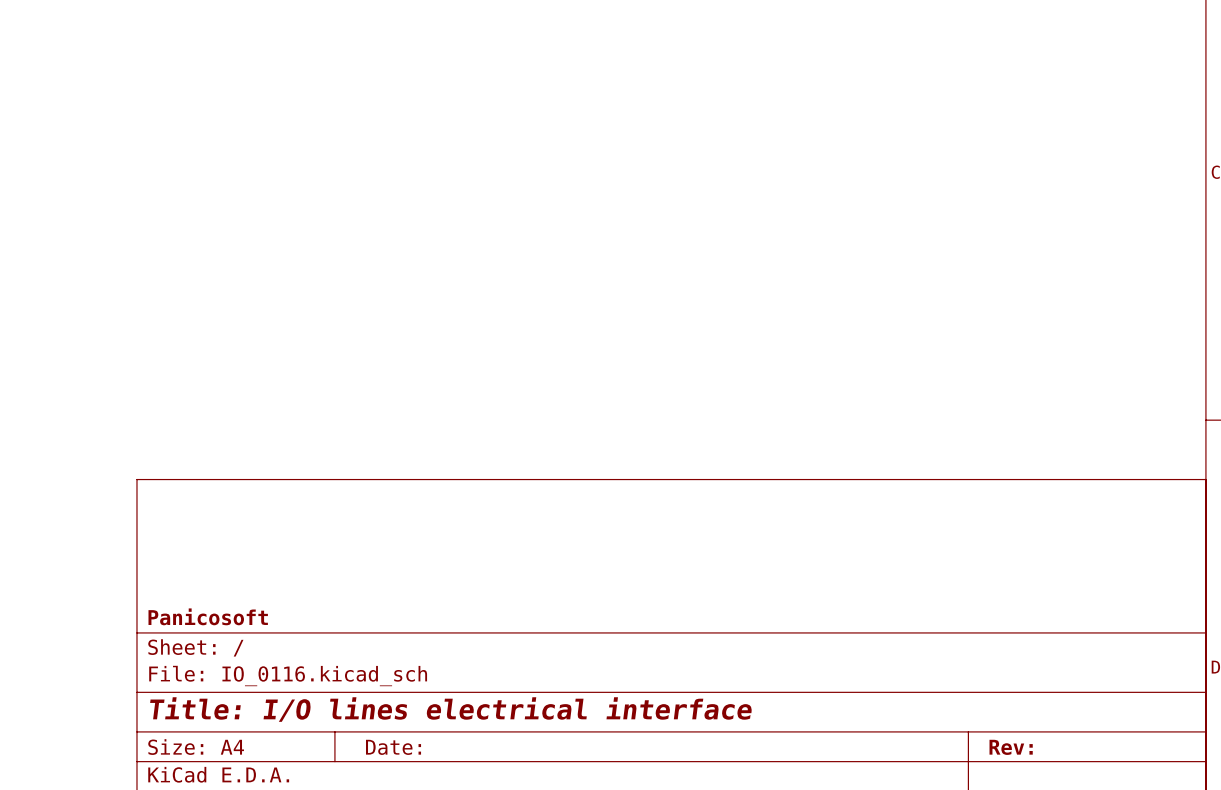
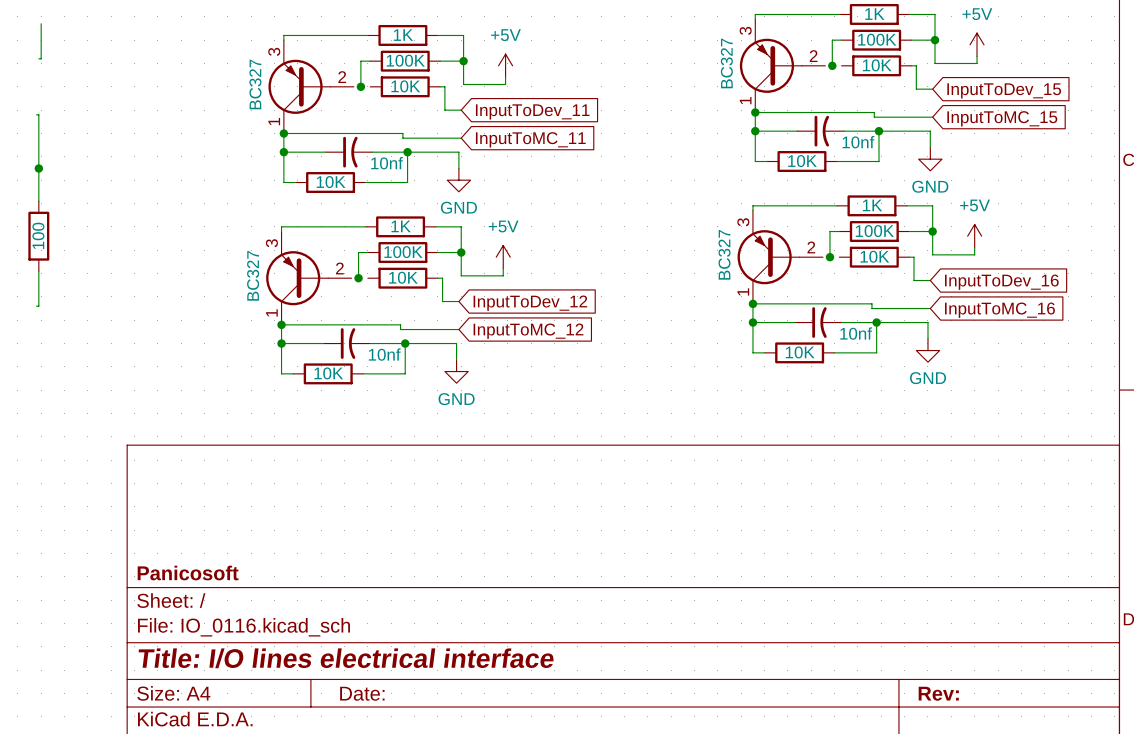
wire: none -> (839, 14) (755, 14) (755, 19)
part: none -> 1K (874, 14)
wire: none -> (909, 14) (935, 14) (935, 63) (977, 63) (977, 56)
wire: none -> (41, 23) (41, 58) (38, 58)
wire: none -> (367, 35) (283, 35) (283, 40)
part: none -> 1K (402, 35)
wire: none -> (437, 35) (463, 35) (463, 84) (505, 84) (505, 77)
wire: none -> (841, 40) (832, 40) (832, 65)
part: none -> 100K (876, 40)
wire: none -> (911, 40) (935, 40)
junction: none -> (935, 40)
power symbol: none -> +5V (977, 44)
wire: none -> (370, 61) (360, 61) (360, 86)
part: none -> 100K (405, 61)
wire: none -> (440, 61) (463, 61)
junction: none -> (463, 61)
power symbol: none -> +5V (505, 65)
part: none -> BC327 (782, 65)
junction: none -> (832, 65)
part: none -> 10K (876, 65)
wire: none -> (911, 65) (916, 65) (916, 89) (932, 89)
part: none -> BC327 (311, 86)
junction: none -> (360, 86)
part: none -> 10K (405, 86)
wire: none -> (440, 86) (444, 86) (444, 110) (461, 110)
global label: none -> InputToDev_15 (1004, 90)
global label: none -> InputToDev_11 (532, 111)
junction: none -> (755, 112)
wire: none -> (36, 114) (38, 114) (38, 201)
wire: none -> (932, 117) (874, 117) (874, 112) (755, 112) (755, 161) (766, 161)
global label: none -> InputToMC_15 (1002, 118)
wire: none -> (755, 131) (797, 131)
junction: none -> (755, 131)
part: none -> 10nf (820, 131)
wire: none -> (843, 131) (930, 131) (930, 147)
wire: none -> (878, 131) (878, 161) (836, 161)
junction: none -> (878, 131)
junction: none -> (283, 133)
wire: none -> (461, 138) (402, 138) (402, 133) (283, 133) (283, 182) (295, 182)
global label: none -> InputToMC_11 (530, 139)
wire: none -> (283, 152) (325, 152)
junction: none -> (283, 152)
part: none -> 10nf (349, 152)
wire: none -> (372, 152) (458, 152) (458, 168)
wire: none -> (407, 152) (407, 182) (365, 182)
junction: none -> (407, 152)
power symbol: none -> GND (930, 159)
part: none -> 10K (801, 161)
junction: none -> (38, 168)
power symbol: none -> GND (458, 180)
part: none -> 10K (330, 182)
wire: none -> (836, 205) (752, 205) (752, 210)
part: none -> 1K (871, 205)
wire: none -> (906, 205) (932, 205) (932, 254) (974, 254) (974, 247)
wire: none -> (365, 226) (281, 226) (281, 231)
part: none -> 1K (400, 226)
wire: none -> (435, 226) (461, 226) (461, 275) (503, 275) (503, 268)
wire: none -> (839, 231) (829, 231) (829, 257)
part: none -> 100K (874, 231)
wire: none -> (909, 231) (932, 231)
junction: none -> (932, 231)
part: none -> 100 (38, 236)
power symbol: none -> +5V (974, 236)
wire: none -> (367, 252) (358, 252) (358, 278)
part: none -> 100K (402, 252)
wire: none -> (437, 252) (461, 252)
junction: none -> (461, 252)
power symbol: none -> +5V (503, 257)
part: none -> BC327 (780, 257)
junction: none -> (829, 257)
part: none -> 10K (874, 257)
wire: none -> (909, 257) (913, 257) (913, 280) (930, 280)
wire: none -> (38, 271) (38, 306) (36, 306)
part: none -> BC327 (308, 278)
junction: none -> (358, 278)
part: none -> 10K (402, 278)
wire: none -> (437, 278) (442, 278) (442, 301) (458, 301)
global label: none -> InputToDev_16 (1001, 282)
global label: none -> InputToDev_12 (530, 303)
junction: none -> (752, 303)
wire: none -> (930, 308) (871, 308) (871, 303) (752, 303) (752, 352) (764, 352)
global label: none -> InputToMC_16 (999, 310)
wire: none -> (752, 322) (794, 322)
junction: none -> (752, 322)
part: none -> 10nf (818, 322)
wire: none -> (841, 322) (927, 322) (927, 338)
wire: none -> (876, 322) (876, 352) (834, 352)
junction: none -> (876, 322)
junction: none -> (281, 324)
wire: none -> (458, 329) (400, 329) (400, 324) (281, 324) (281, 373) (293, 373)
global label: none -> InputToMC_12 (528, 331)
wire: none -> (281, 343) (323, 343)
junction: none -> (281, 343)
part: none -> 10nf (346, 343)
wire: none -> (370, 343) (456, 343) (456, 359)
wire: none -> (405, 343) (405, 373) (363, 373)
junction: none -> (405, 343)
power symbol: none -> GND (927, 350)
part: none -> 10K (799, 352)
power symbol: none -> GND (456, 371)
part: none -> 10K (328, 373)

